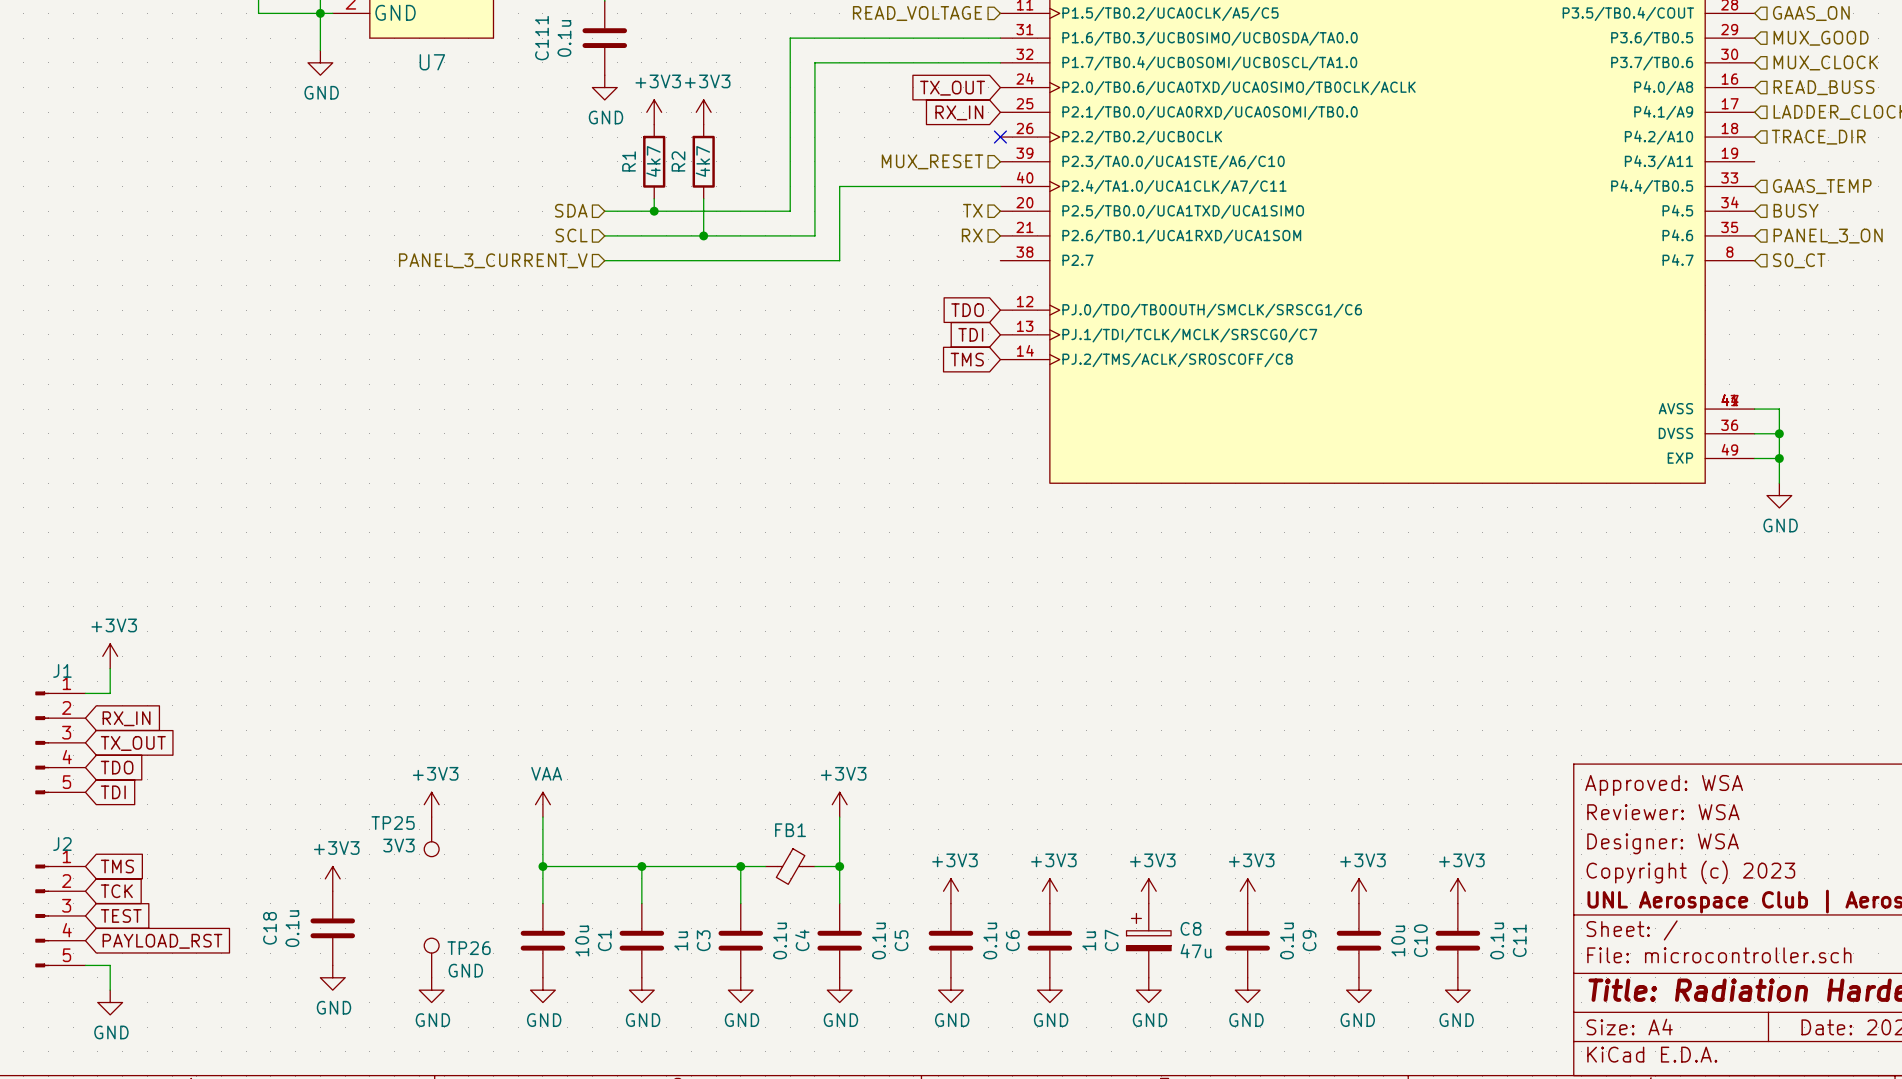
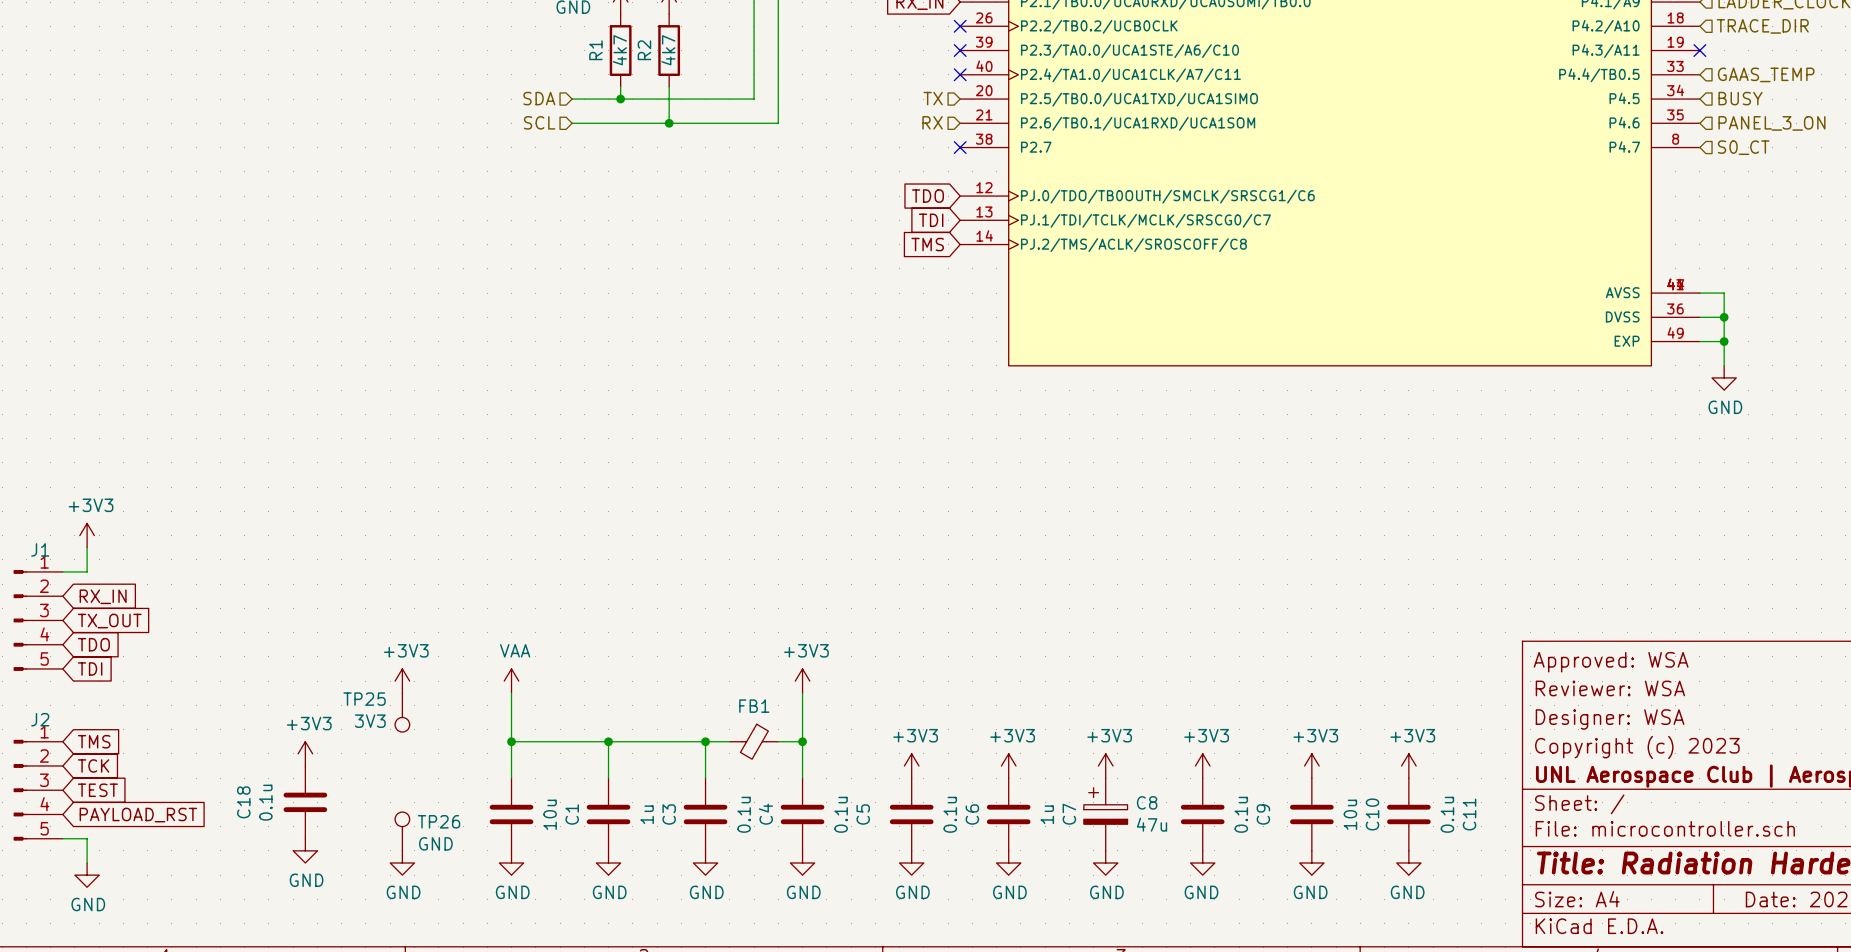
hierarchical label: MUX_RESET (932, 161) -> none
no-connect mark: none -> (960, 50)
no-connect mark: none -> (1699, 50)
wire: (1000, 186) (839, 186) (839, 260) (604, 260) -> none
no-connect mark: none -> (960, 74)
hierarchical label: PANEL_3_CURRENT_V (493, 260) -> none
no-connect mark: none -> (960, 147)

